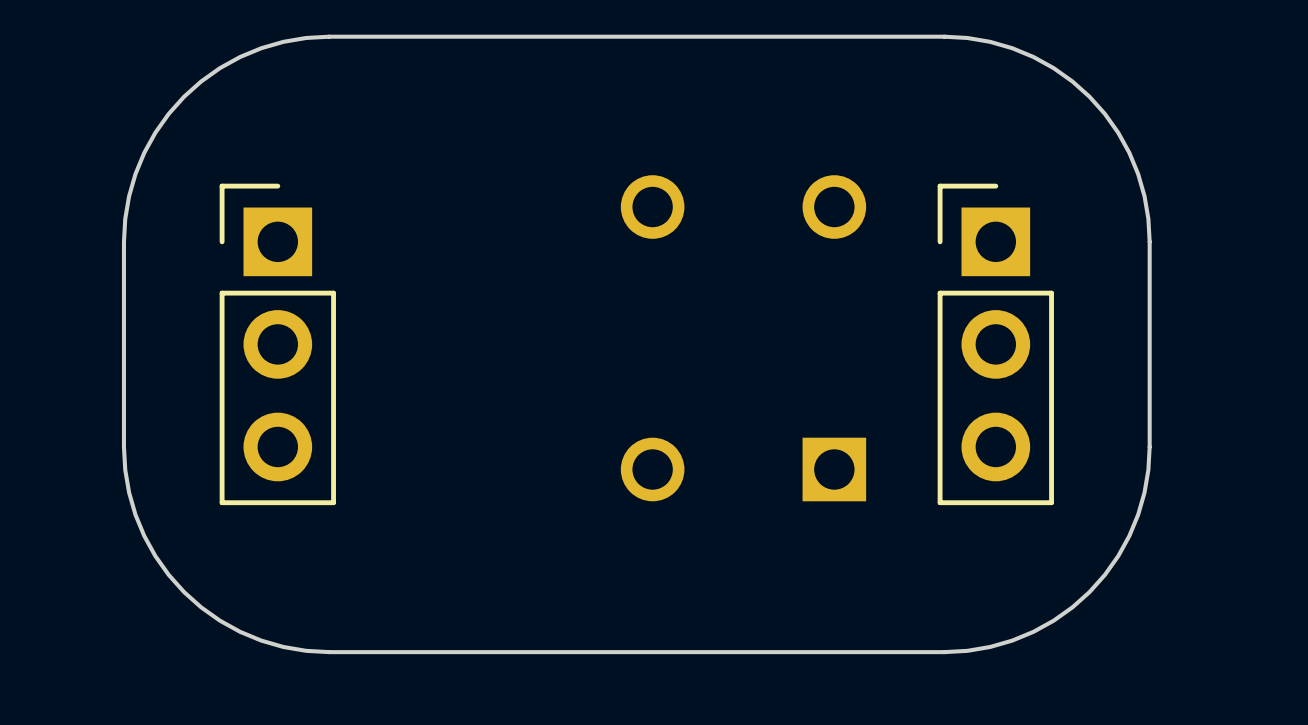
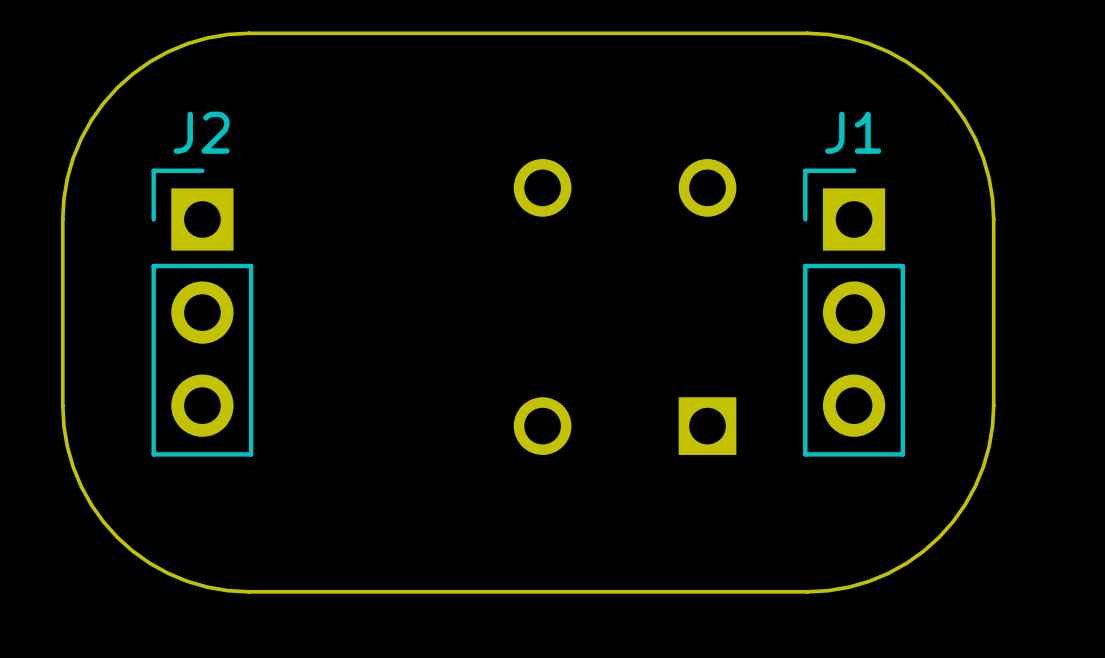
part: (277, 344) -> none
J2: none -> (202, 312)
part: (995, 344) -> none
J1: none -> (854, 312)

